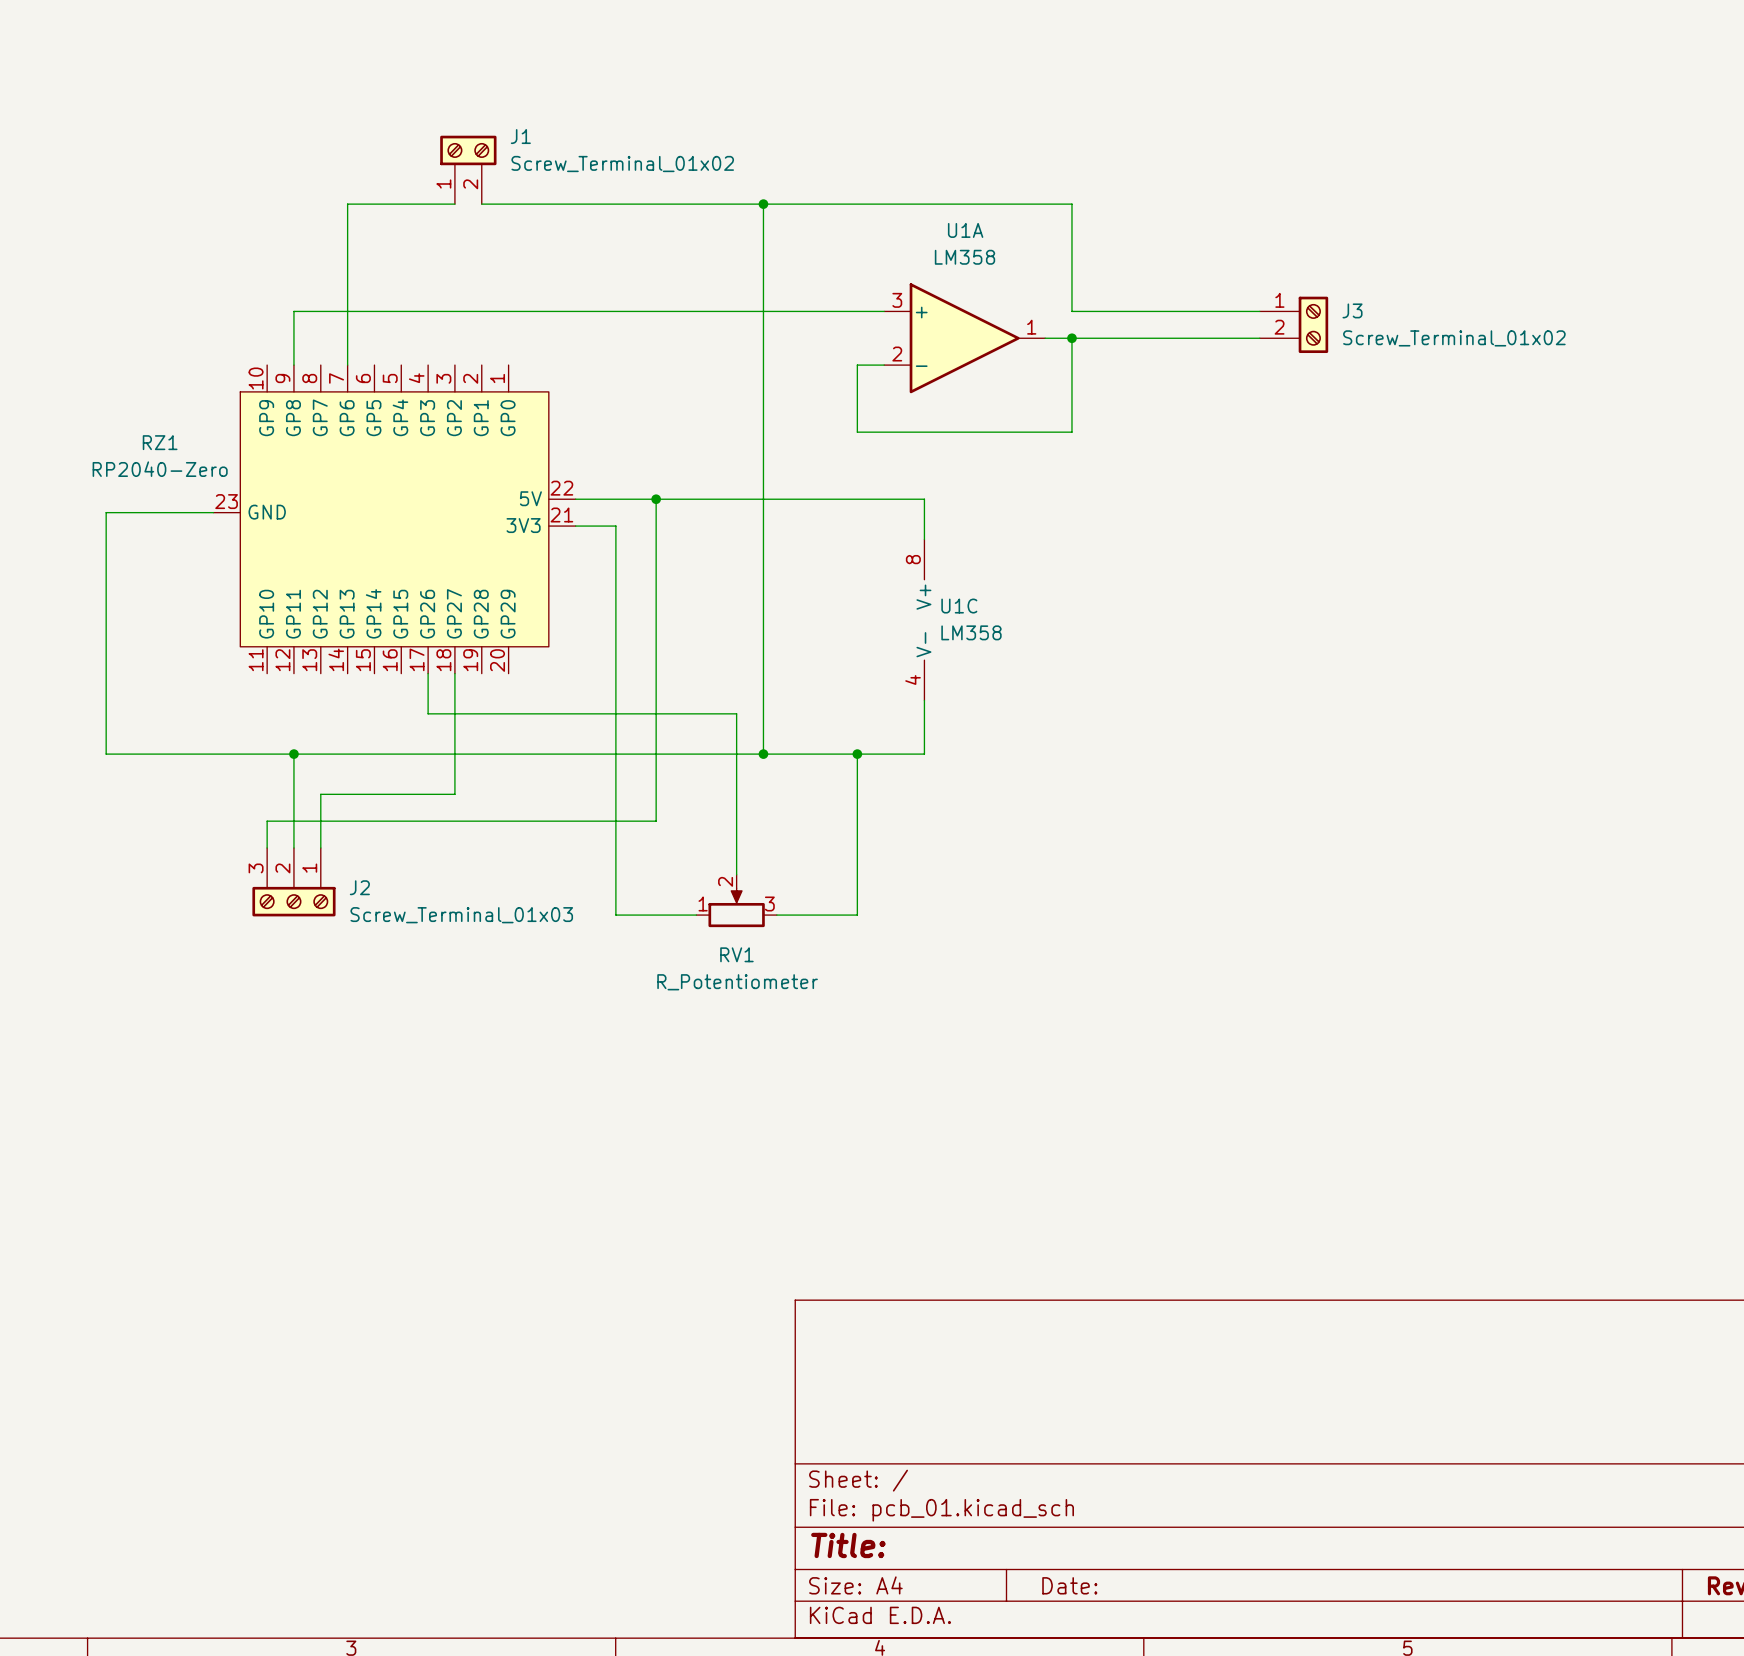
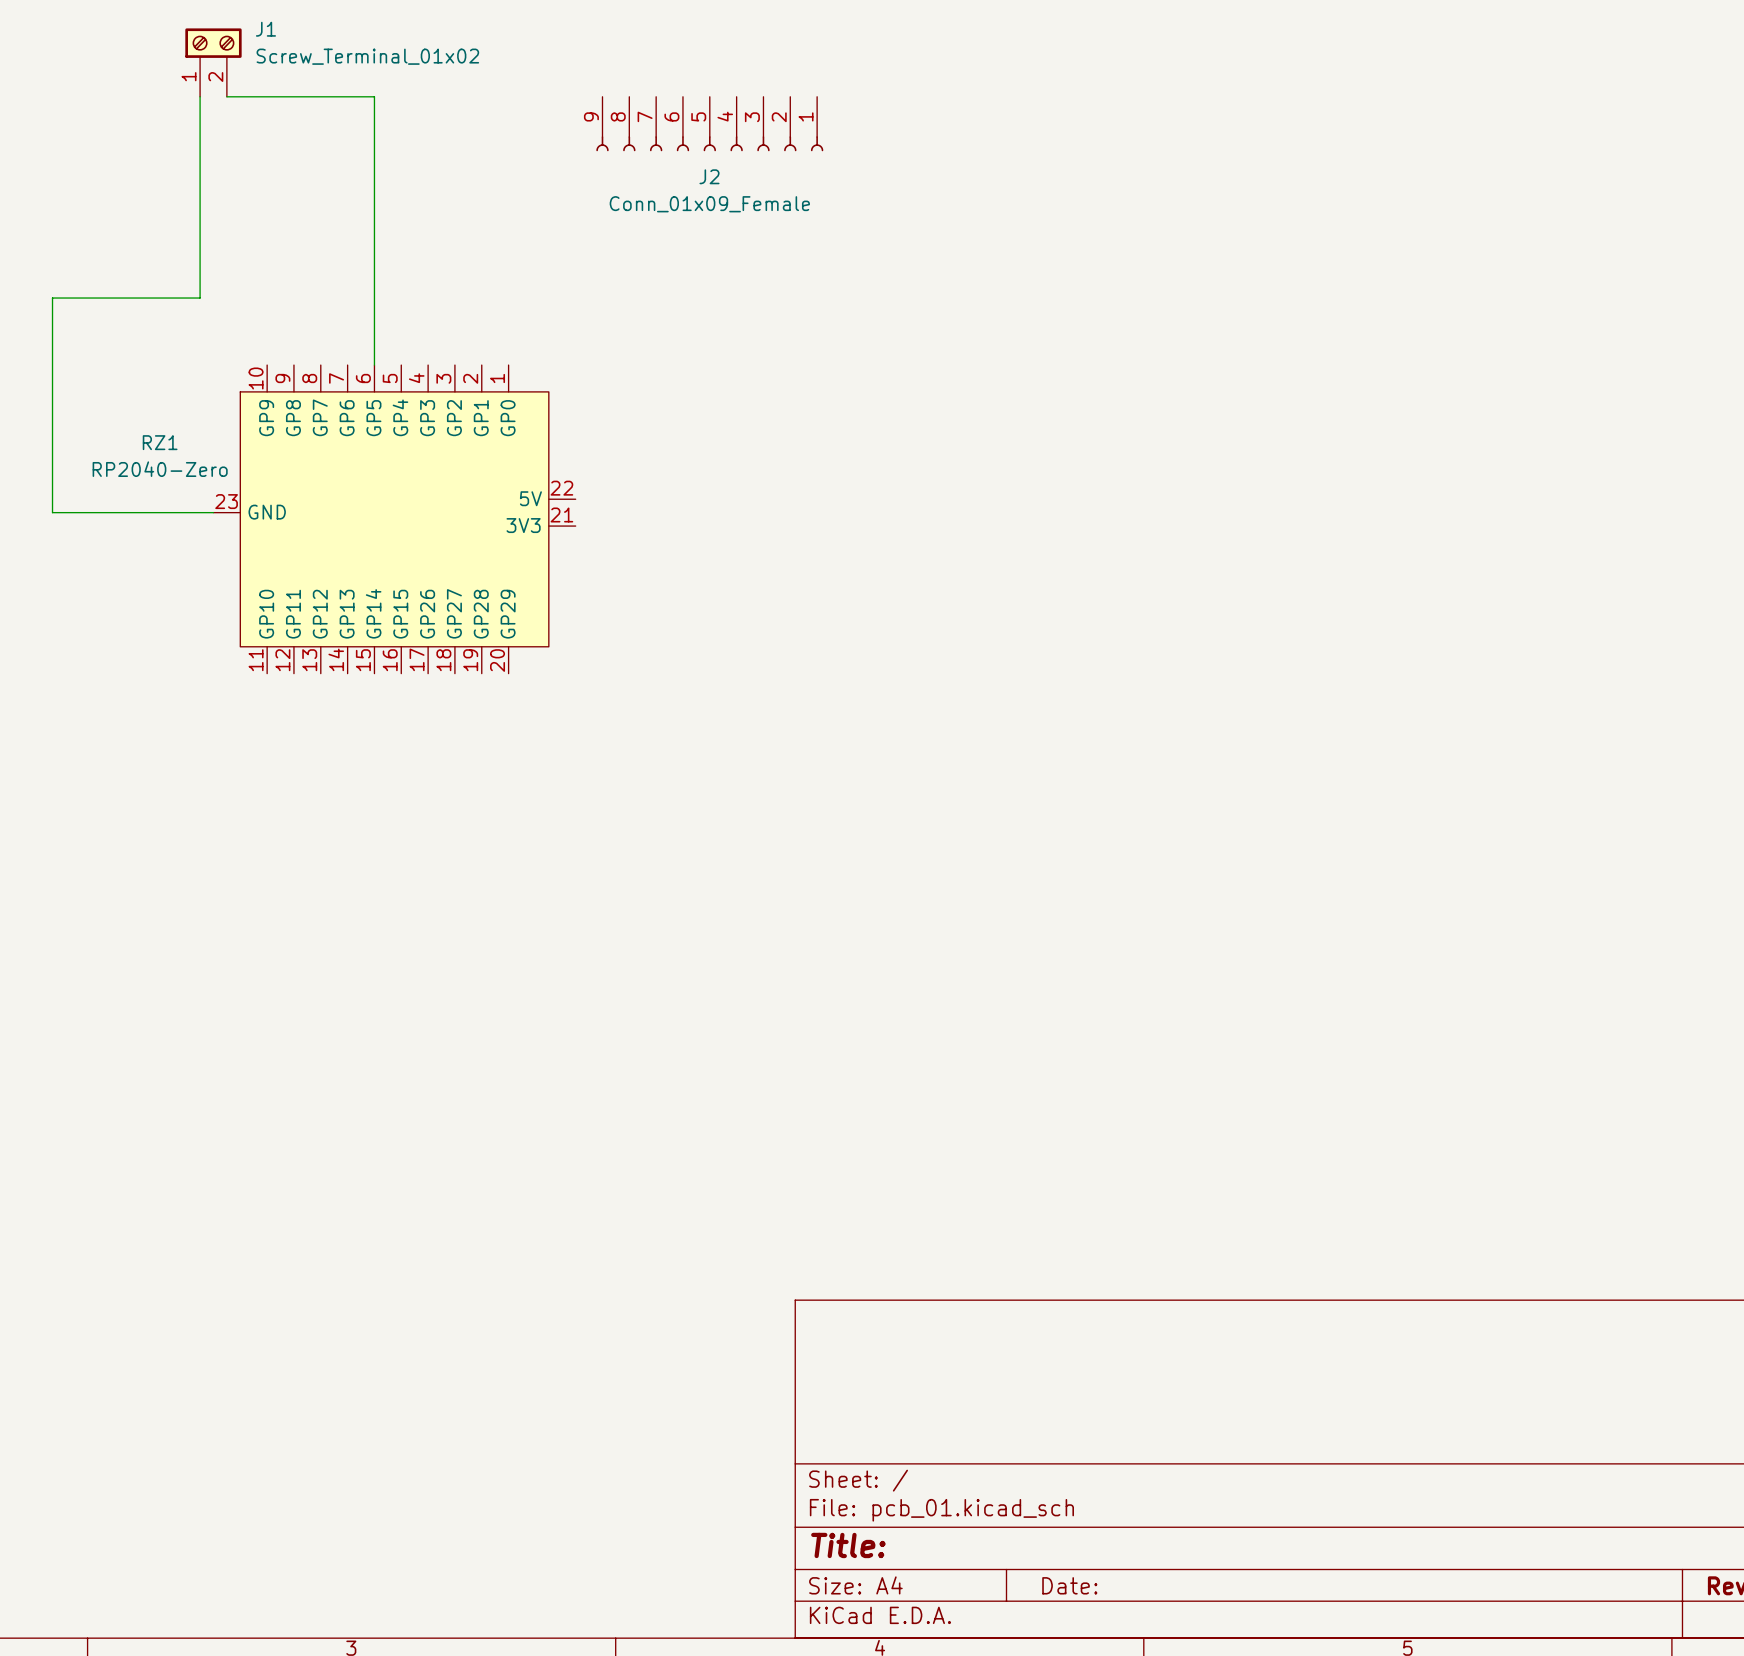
wire: none -> (226, 96) (374, 96) (374, 365)
J1 position: (468, 169) -> (213, 62)
wire: (454, 204) (347, 204) (347, 365) -> none
wire: (481, 204) (1071, 204) (1071, 311) (1259, 311) -> none
wire: (763, 204) (763, 754) -> none
junction: (763, 204) -> none
wire: (884, 311) (293, 311) (293, 365) -> none
J3: Screw_Terminal_01x02 (1293, 324) -> none
U1A: LM358 (964, 338) -> none
wire: (1045, 338) (1259, 338) -> none
wire: (1071, 338) (1071, 432) (857, 432) (857, 365) (884, 365) -> none
junction: (1071, 338) -> none
wire: (575, 499) (924, 499) (924, 539) -> none
wire: (656, 499) (656, 821) (267, 821) (267, 847) -> none
junction: (656, 499) -> none
wire: (106, 512) (106, 754) (924, 754) (924, 700) -> (106, 512) (52, 512) (52, 298) (200, 298) (200, 96)
wire: (575, 526) (615, 526) (615, 915) (696, 915) -> none
U1C: LM358 (924, 619) -> none
wire: (428, 673) (428, 713) (736, 713) (736, 874) -> none
wire: (454, 673) (454, 794) (320, 794) (320, 847) -> none
wire: (293, 754) (293, 847) -> none
junction: (293, 754) -> none
junction: (763, 754) -> none
wire: (857, 754) (857, 915) (776, 915) -> none
junction: (857, 754) -> none
J2 symbol: [252, 847, 336, 917] -> [596, 96, 824, 152]
J2 name position: J2 (359, 887) -> J2 (709, 176)
RV1: R_Potentiometer (736, 900) -> none
J2 value: Screw_Terminal_01x03 (461, 915) -> Conn_01x09_Female (709, 204)

